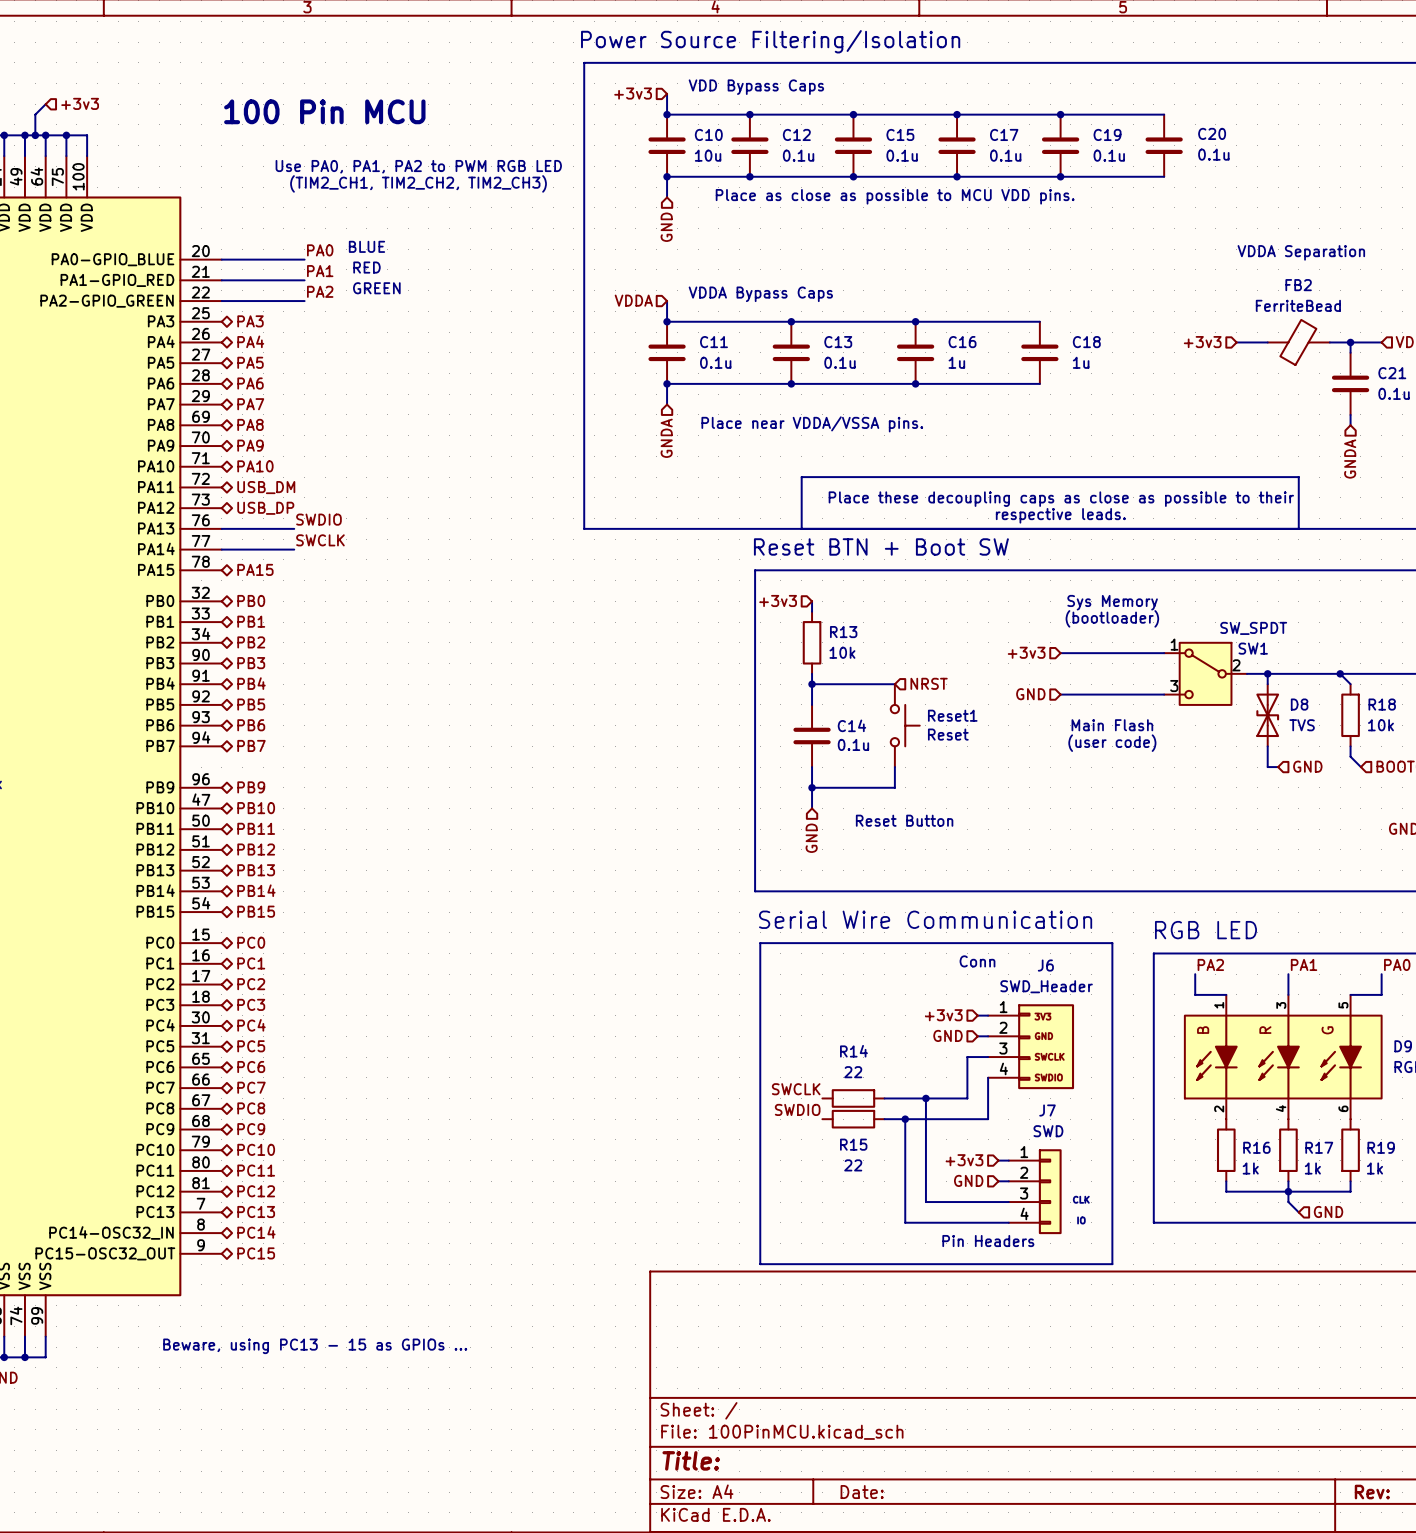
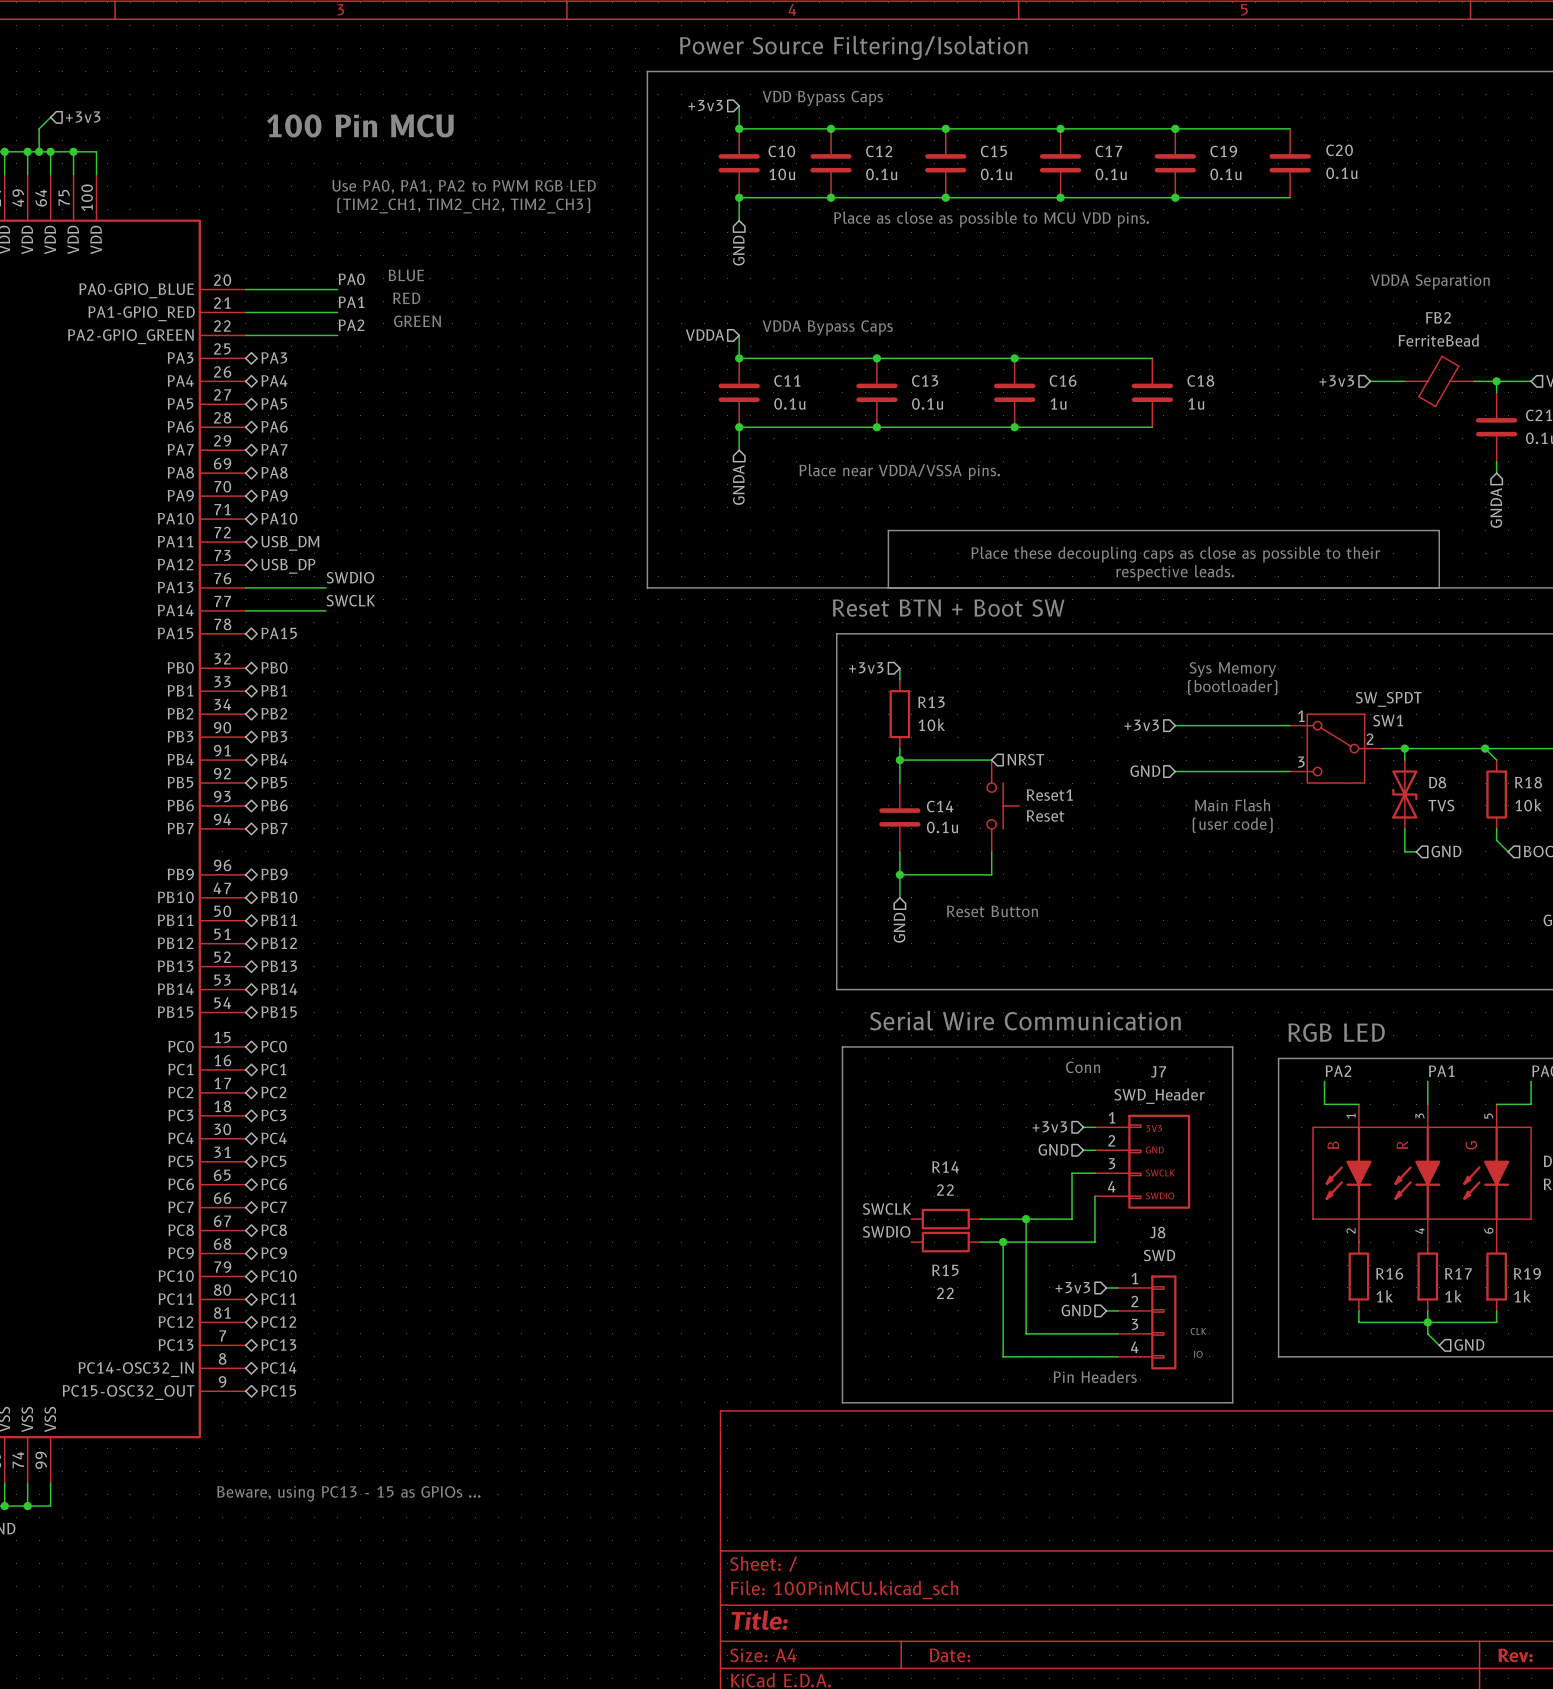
J6 name: J6 (1045, 965) -> J7 (1158, 1071)
J7 name: J7 (1047, 1110) -> J8 (1157, 1232)

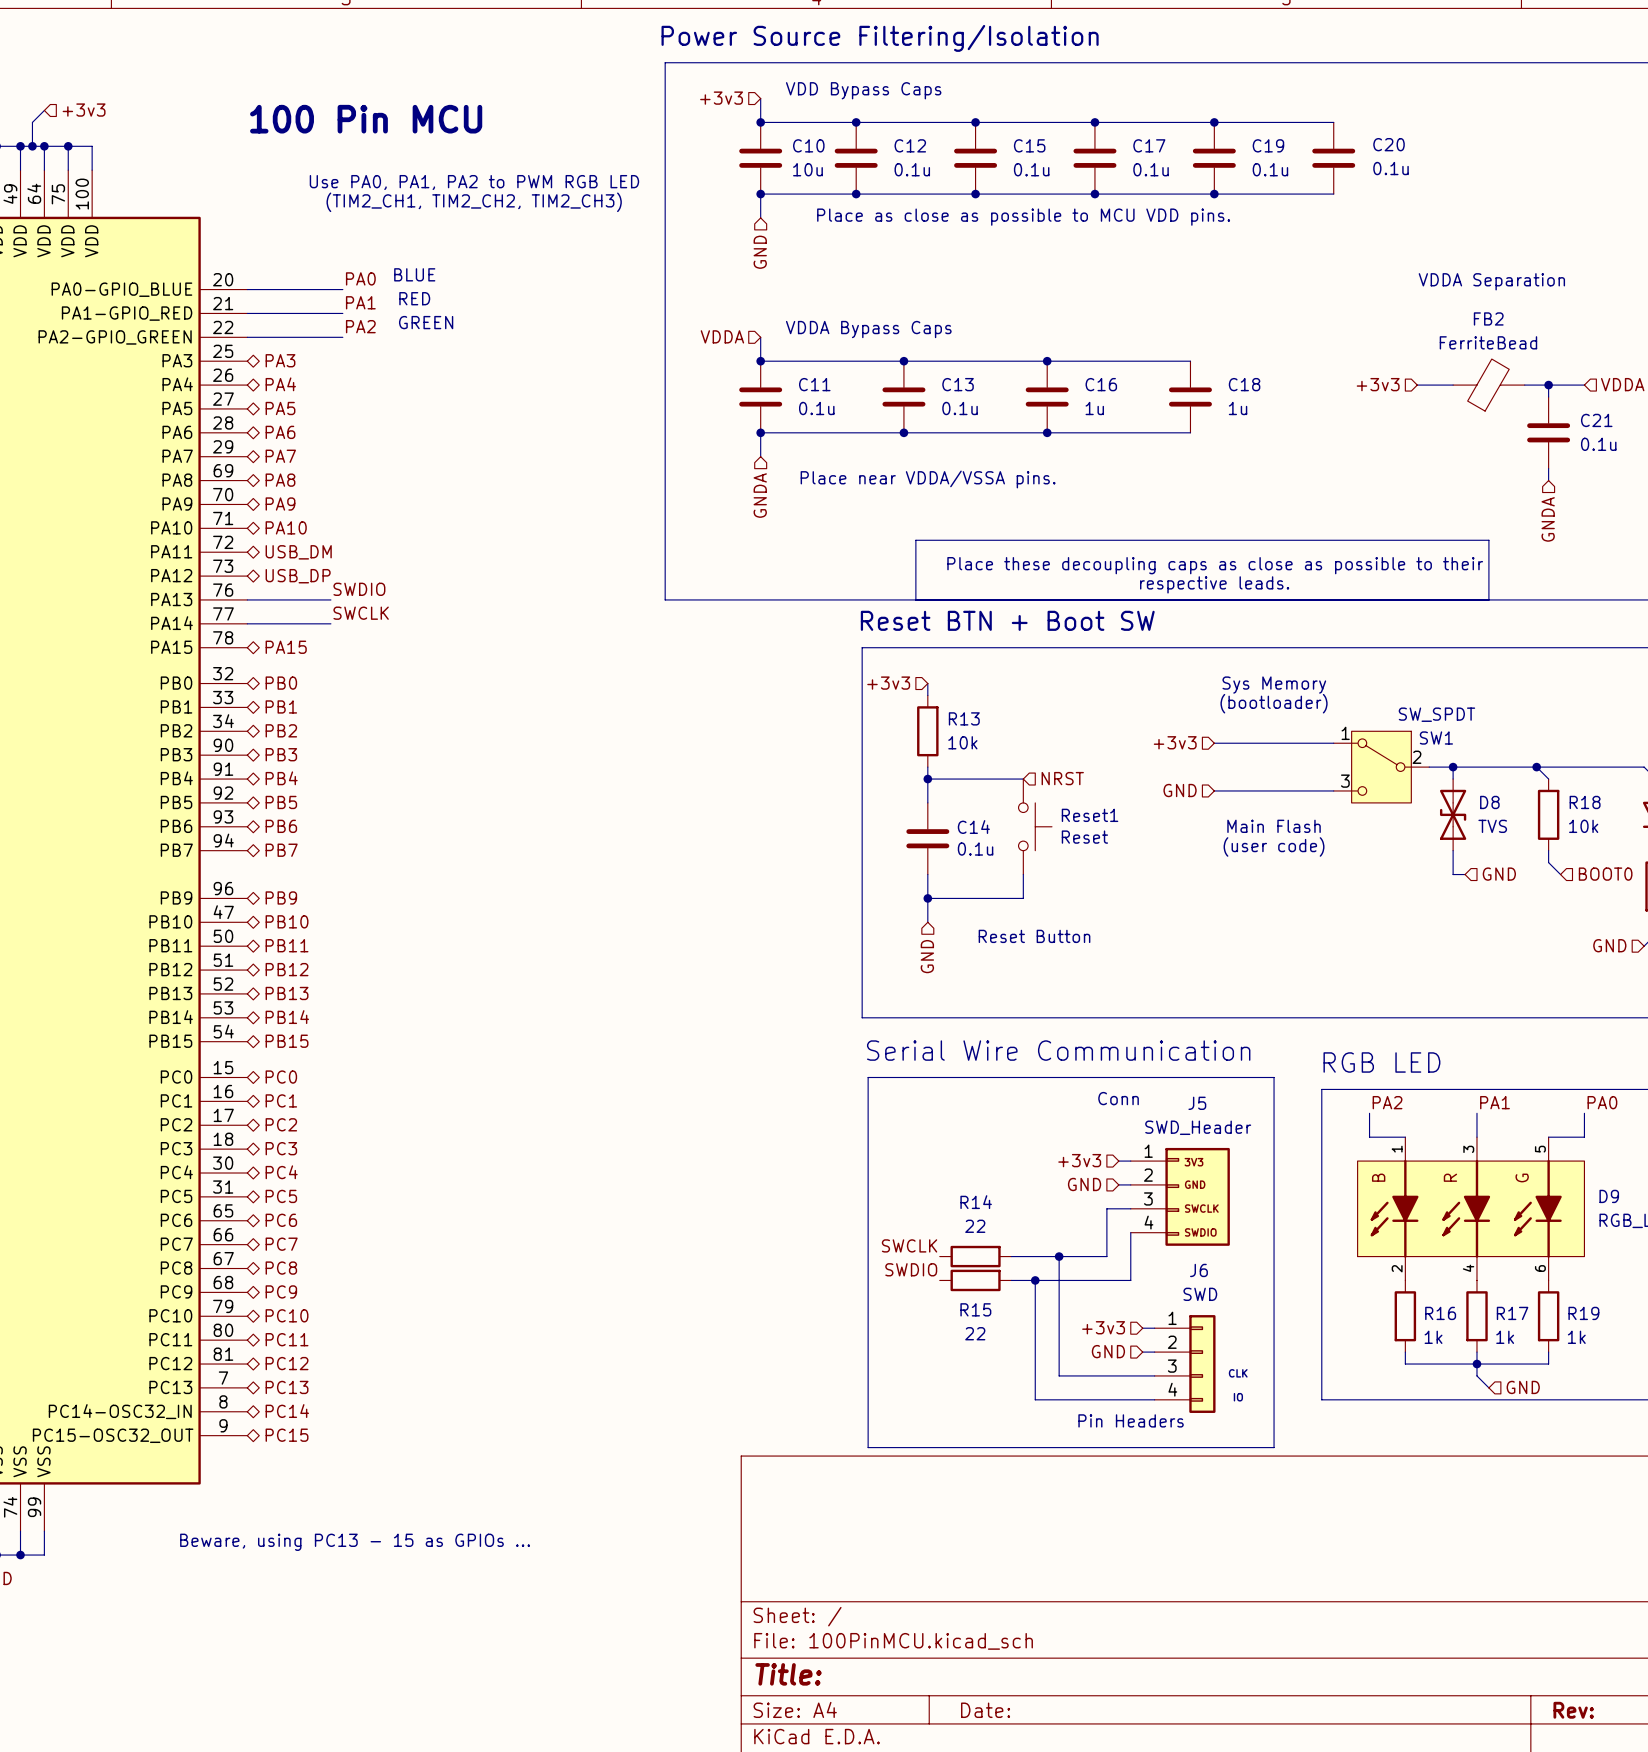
J7 name: J7 (1158, 1071) -> J5 (1197, 1103)
J8 name: J8 (1157, 1232) -> J6 (1198, 1270)

